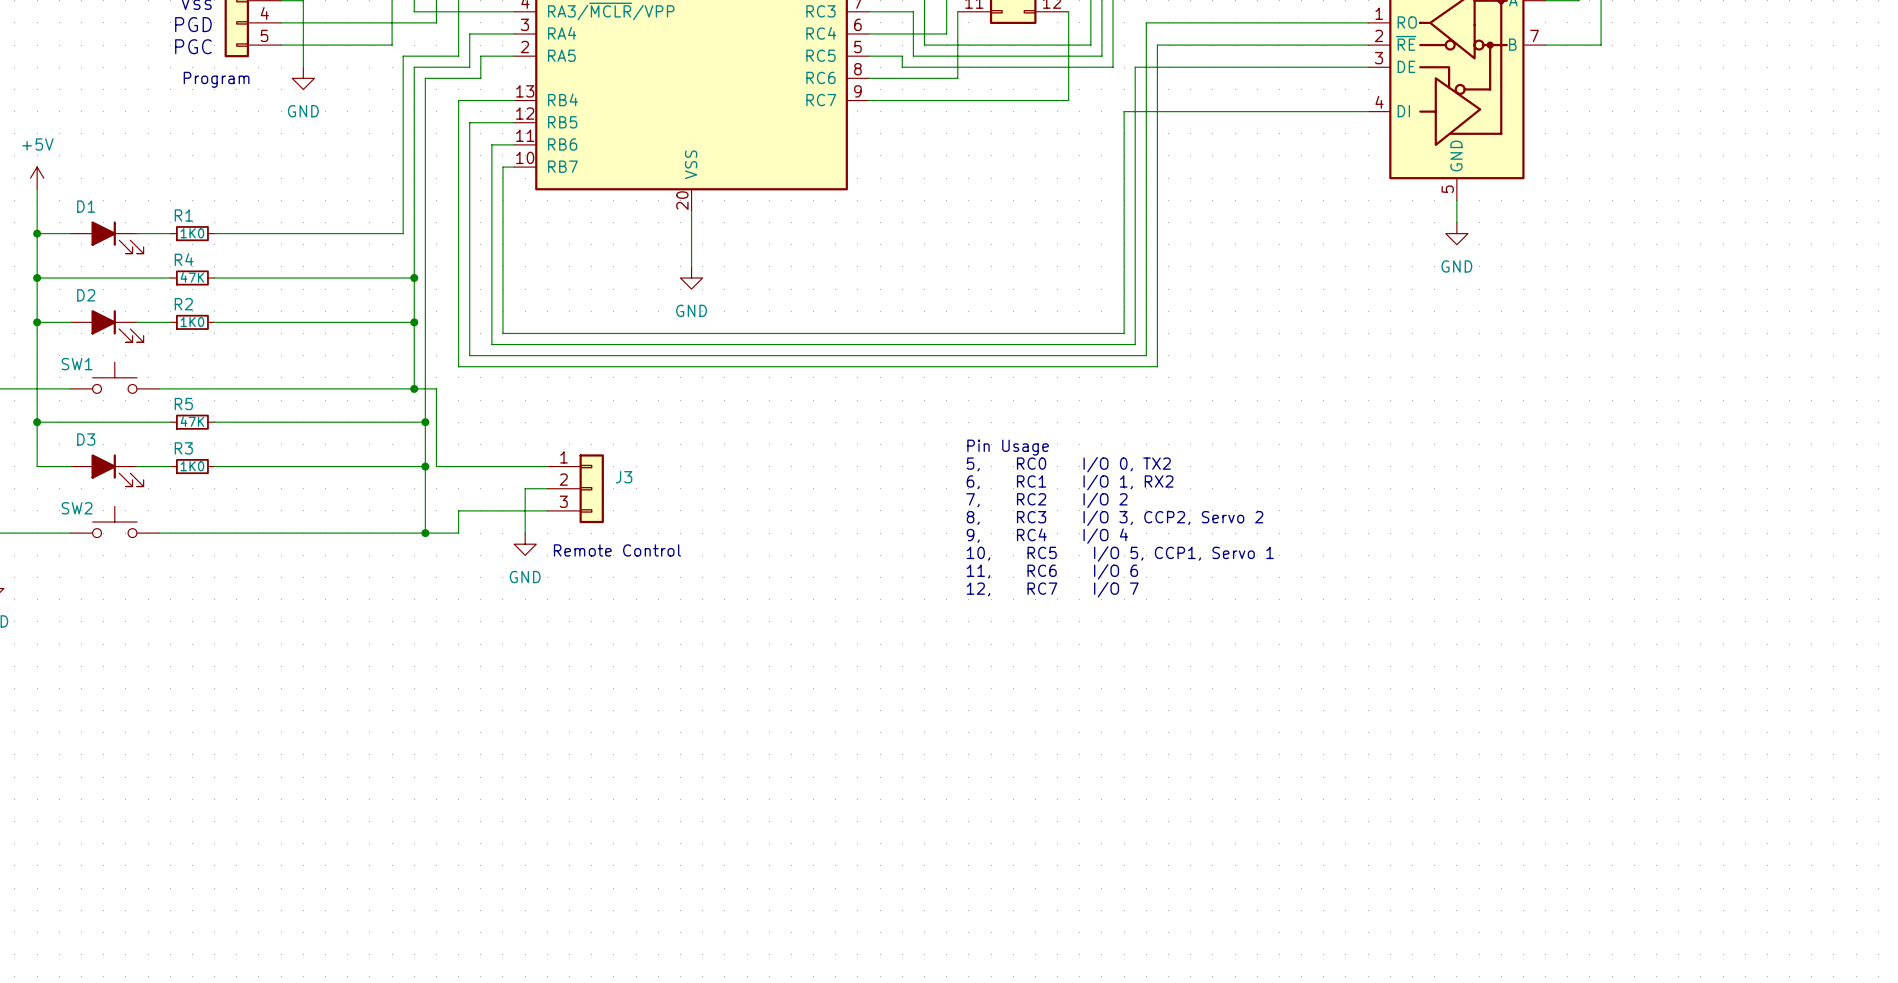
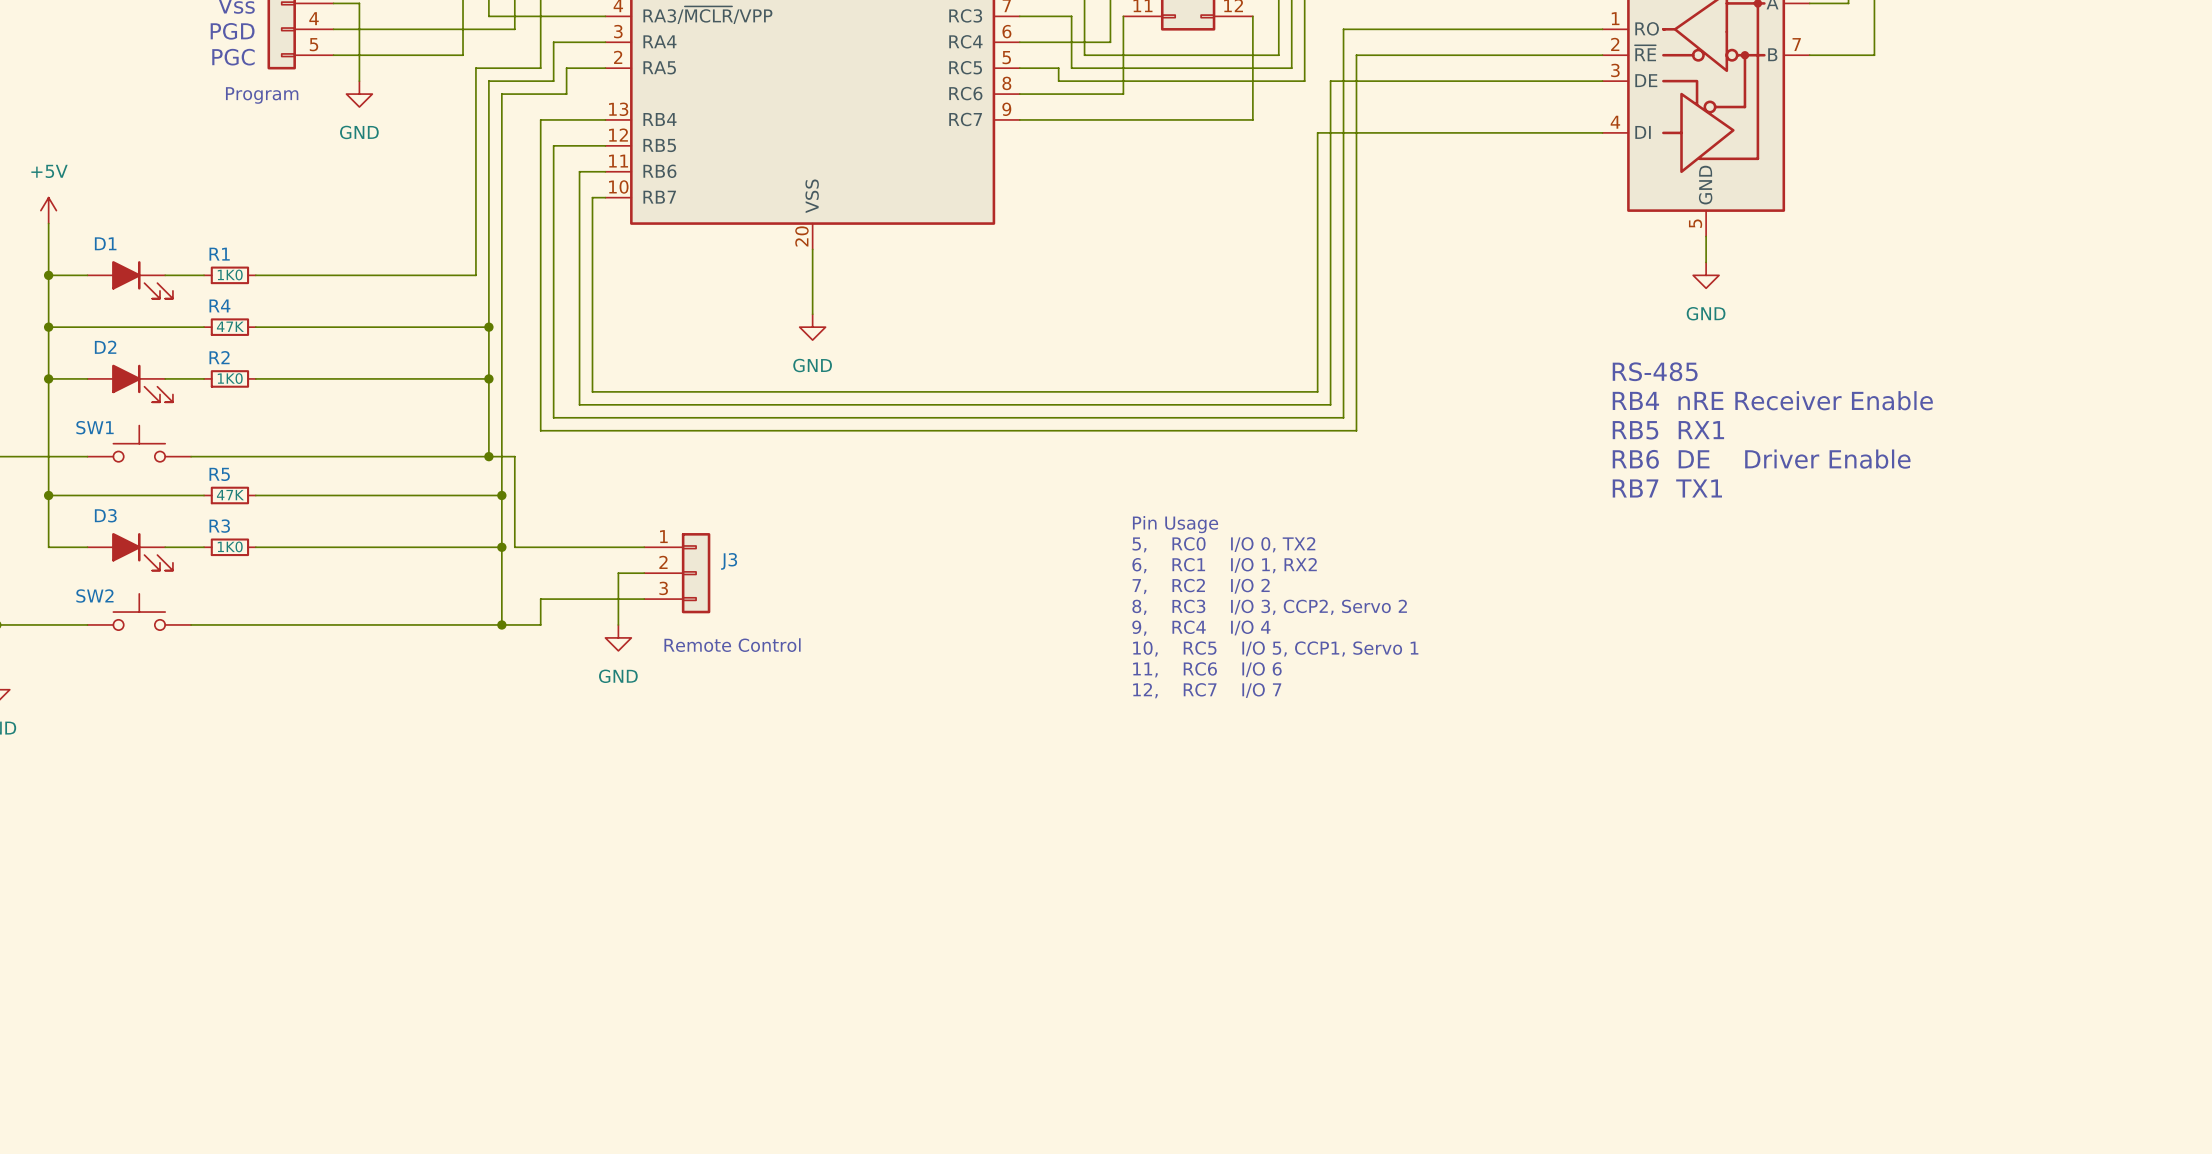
text: none -> RS-485 (1655, 371)
text: none -> RB4 nRE Receiver Enable (1772, 400)
text: none -> RB5 RX1 (1668, 430)
text: none -> RB6 DE Driver Enable (1761, 459)
text: none -> RB7 TX1 (1667, 488)

